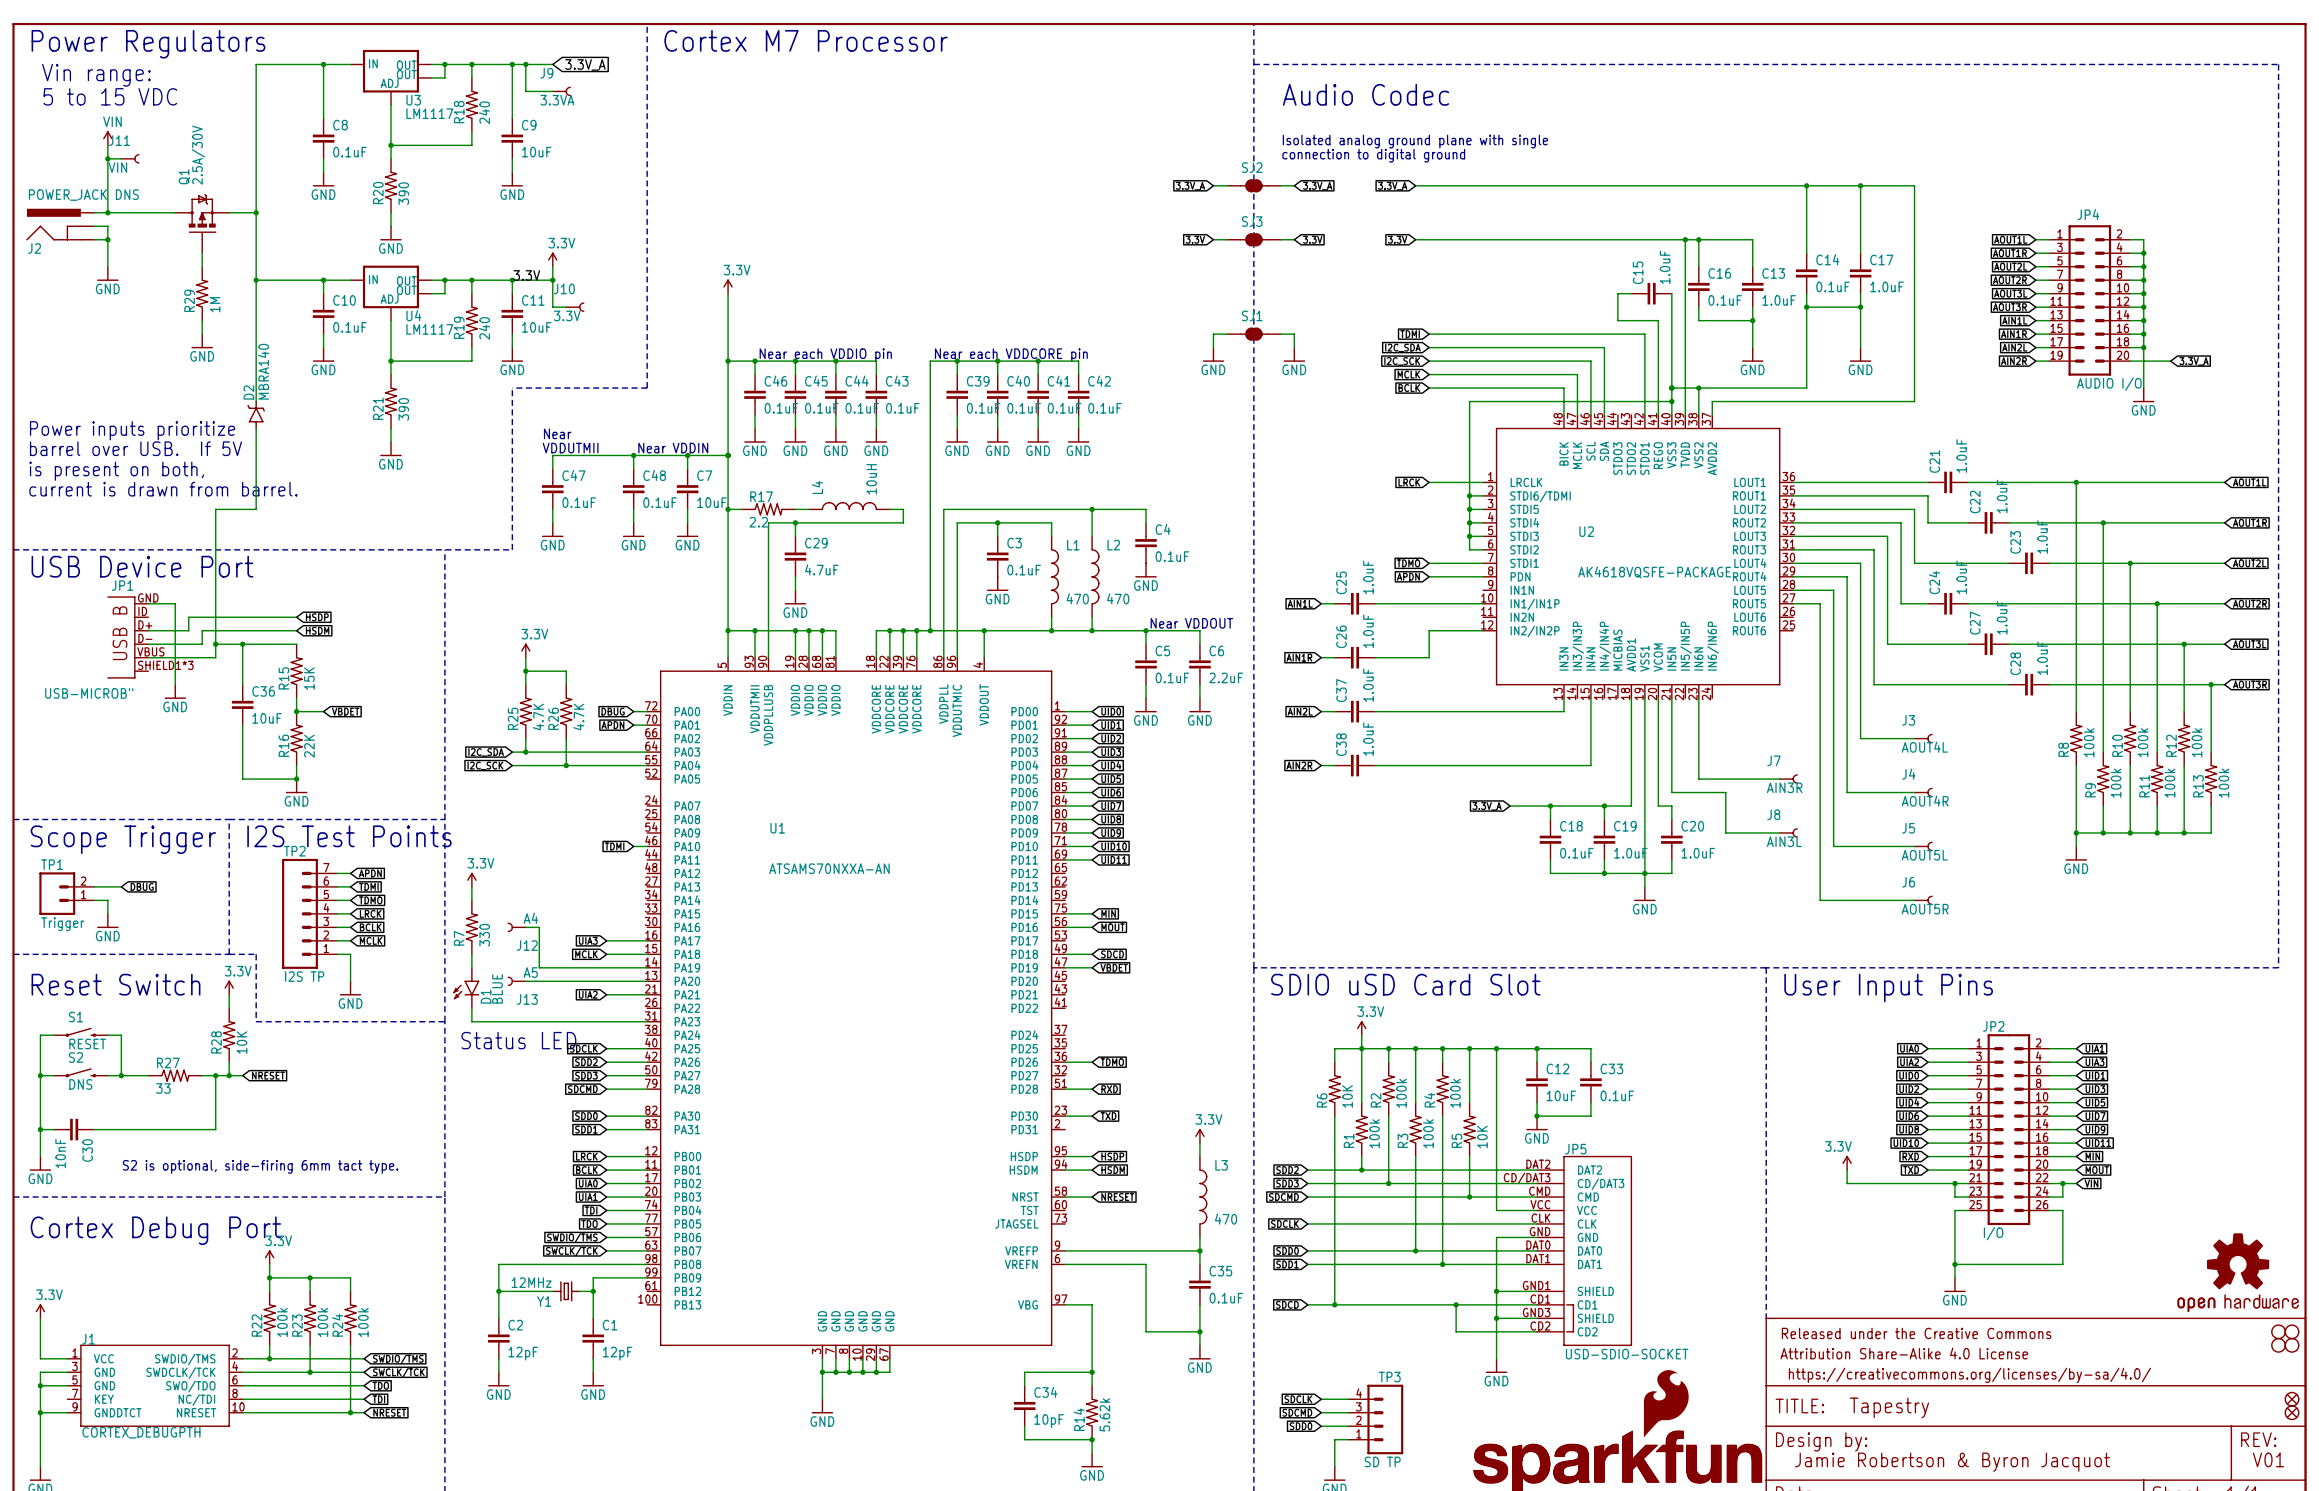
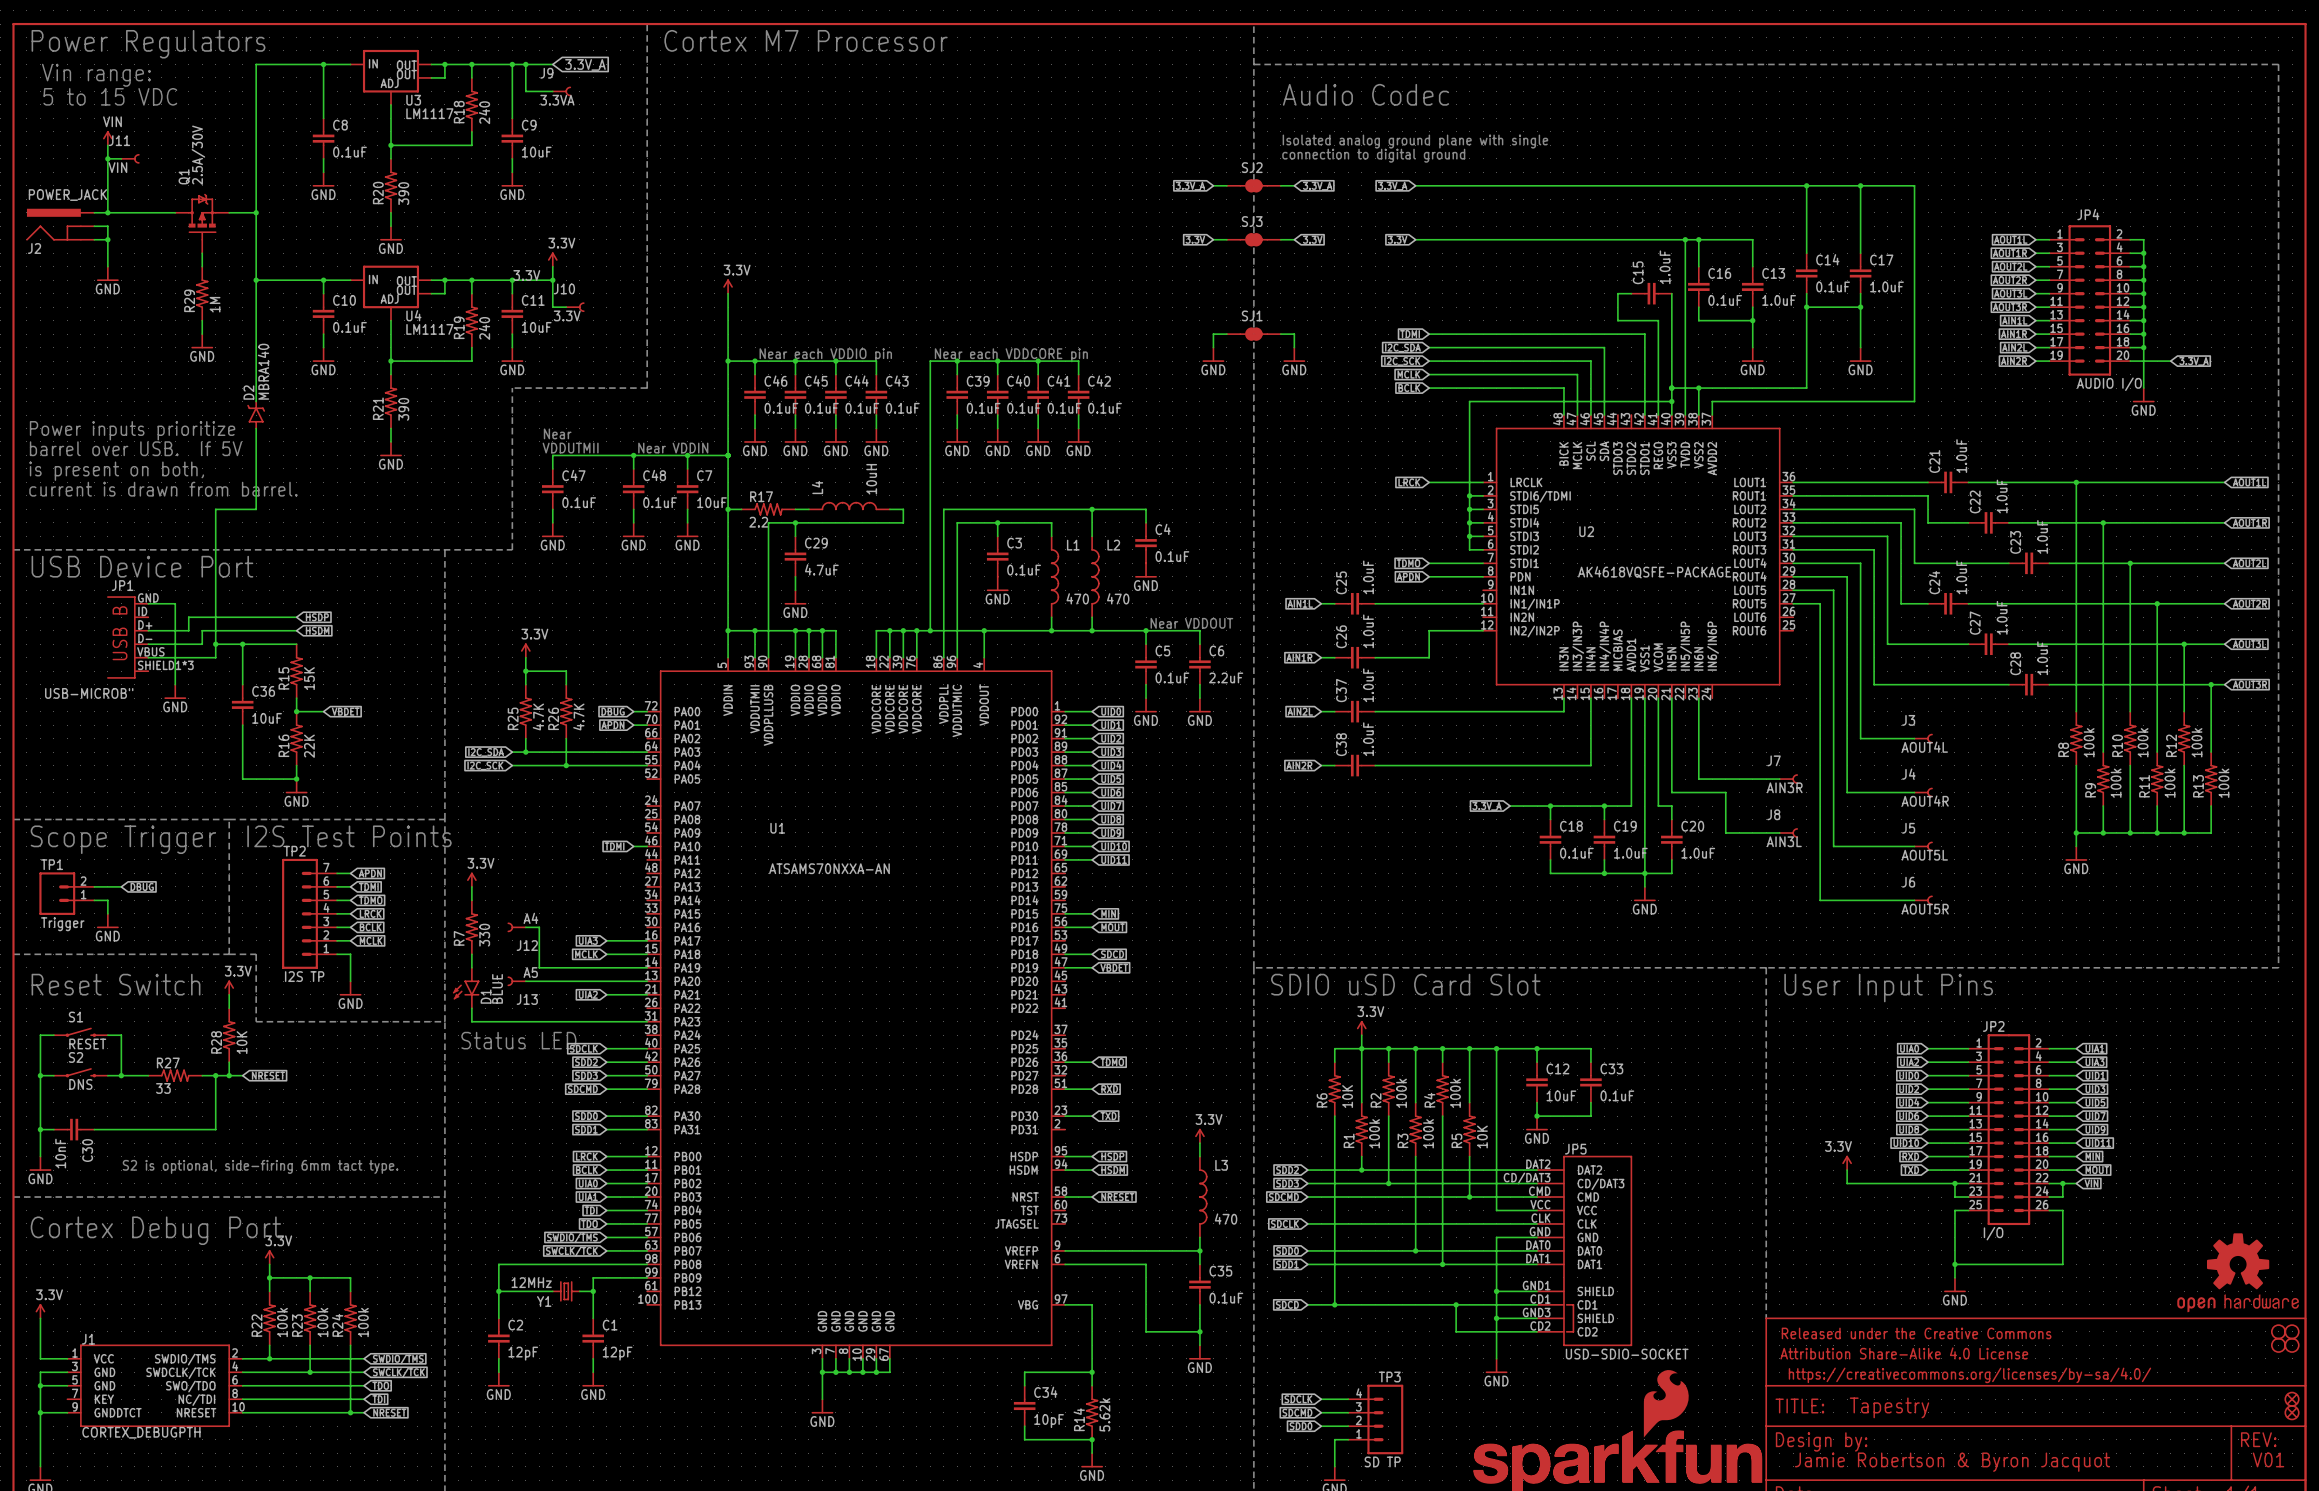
J2 value: POWER_JACK DNS (83, 195) -> POWER_JACK (67, 195)

